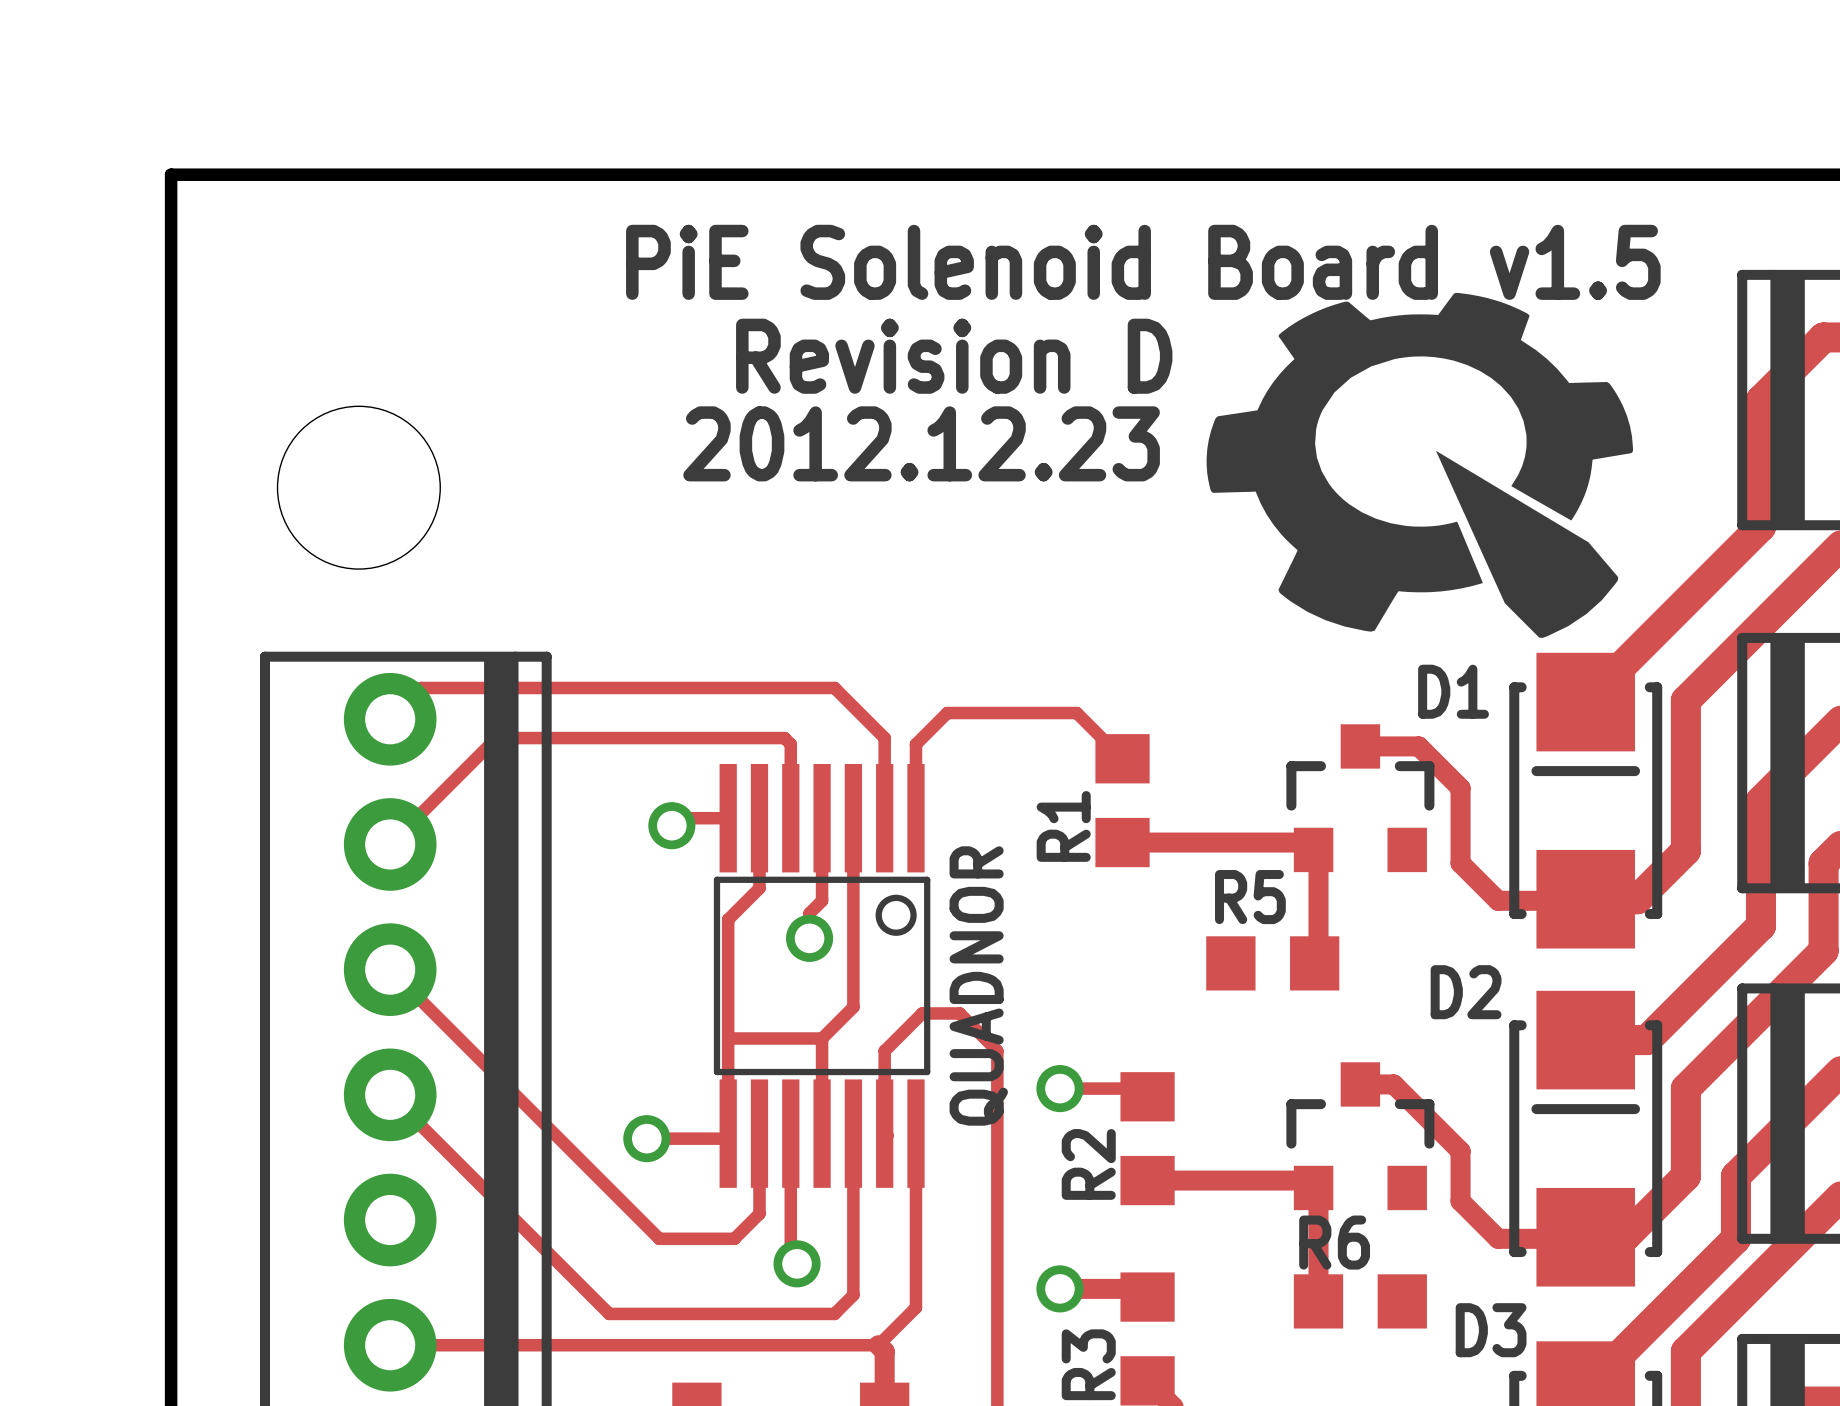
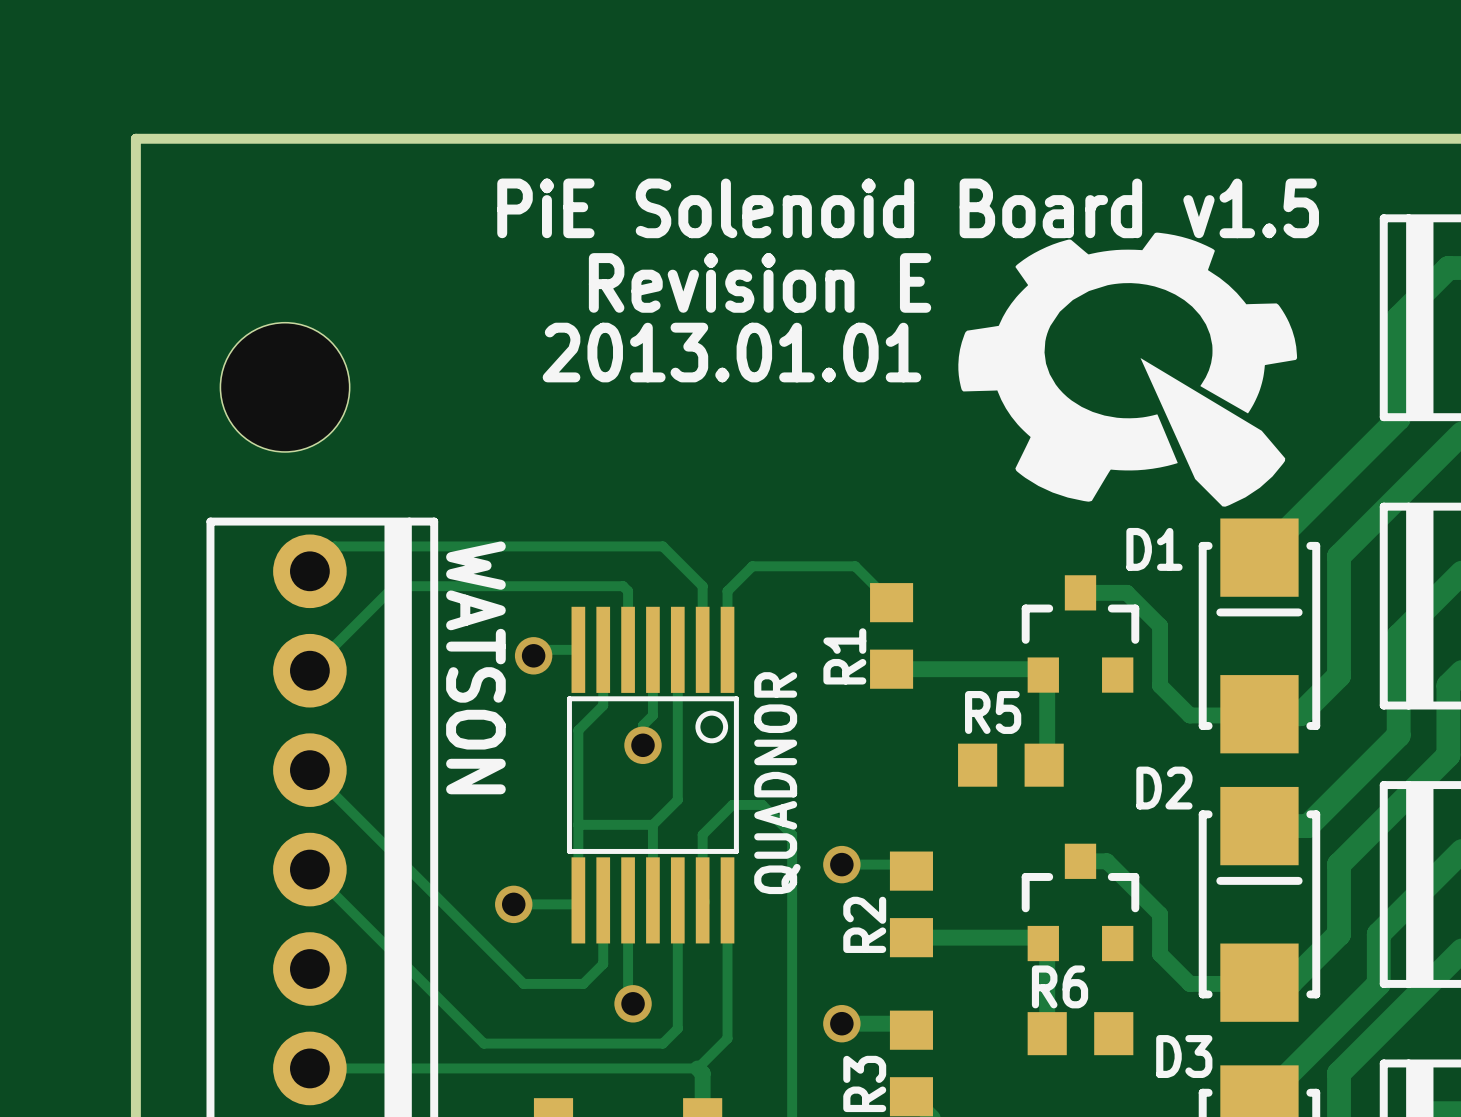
text: Revision D (954, 356) -> Revision E (760, 282)
text: 2012.12.23 (921, 443) -> 2013.01.01 (731, 352)
WATSON name: none -> WATSON (475, 667)

